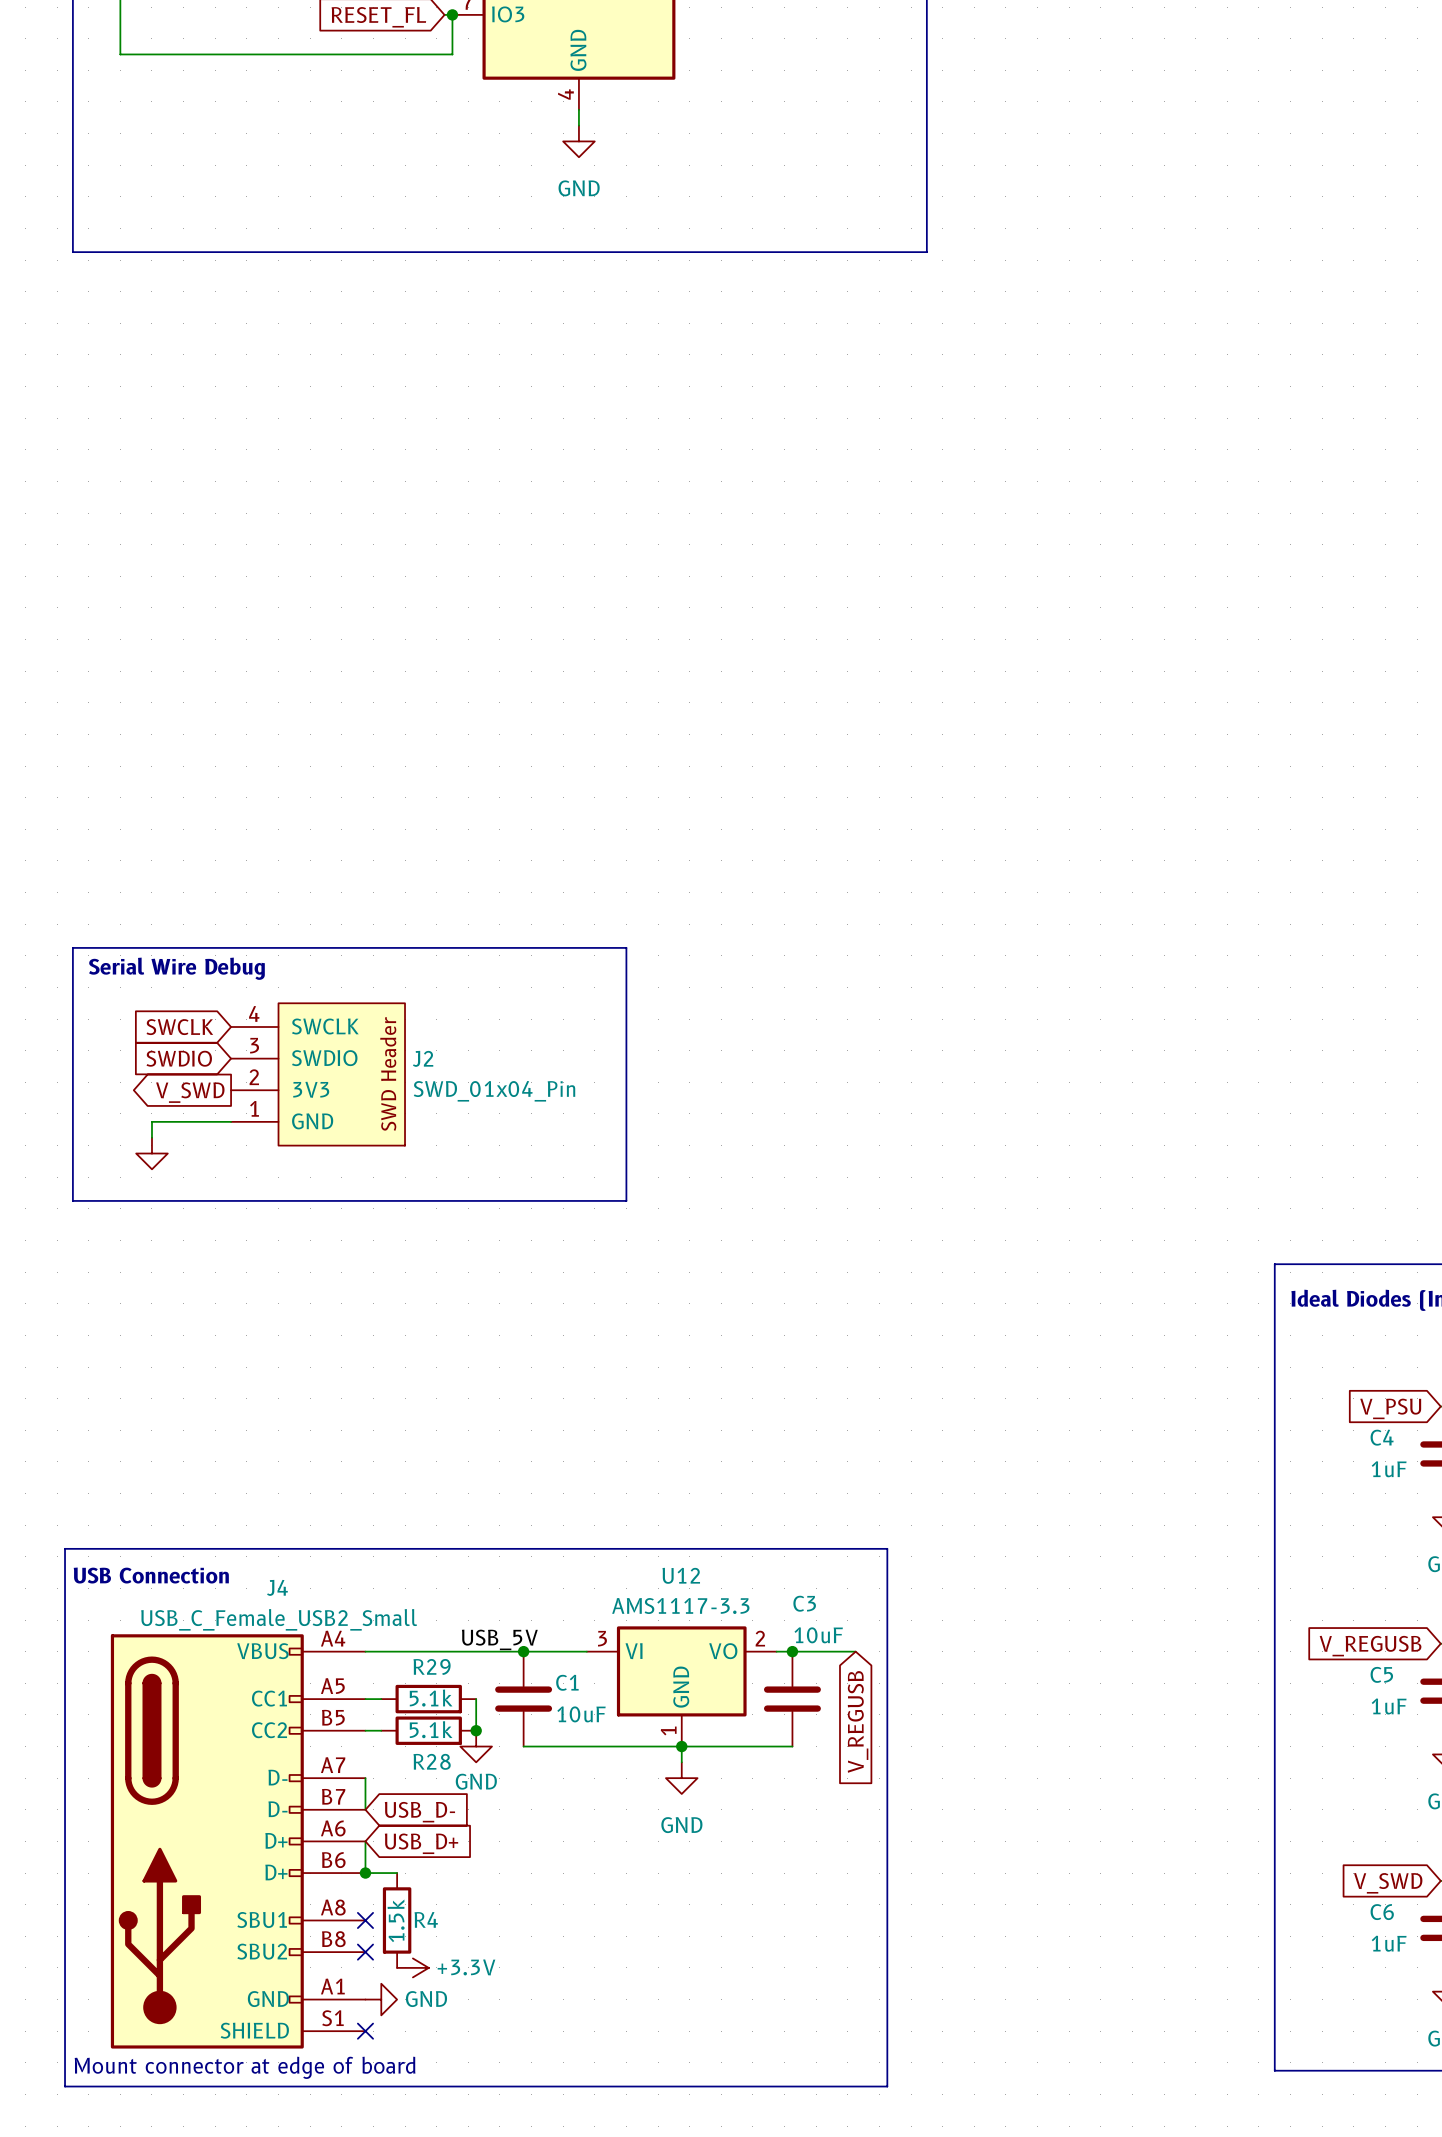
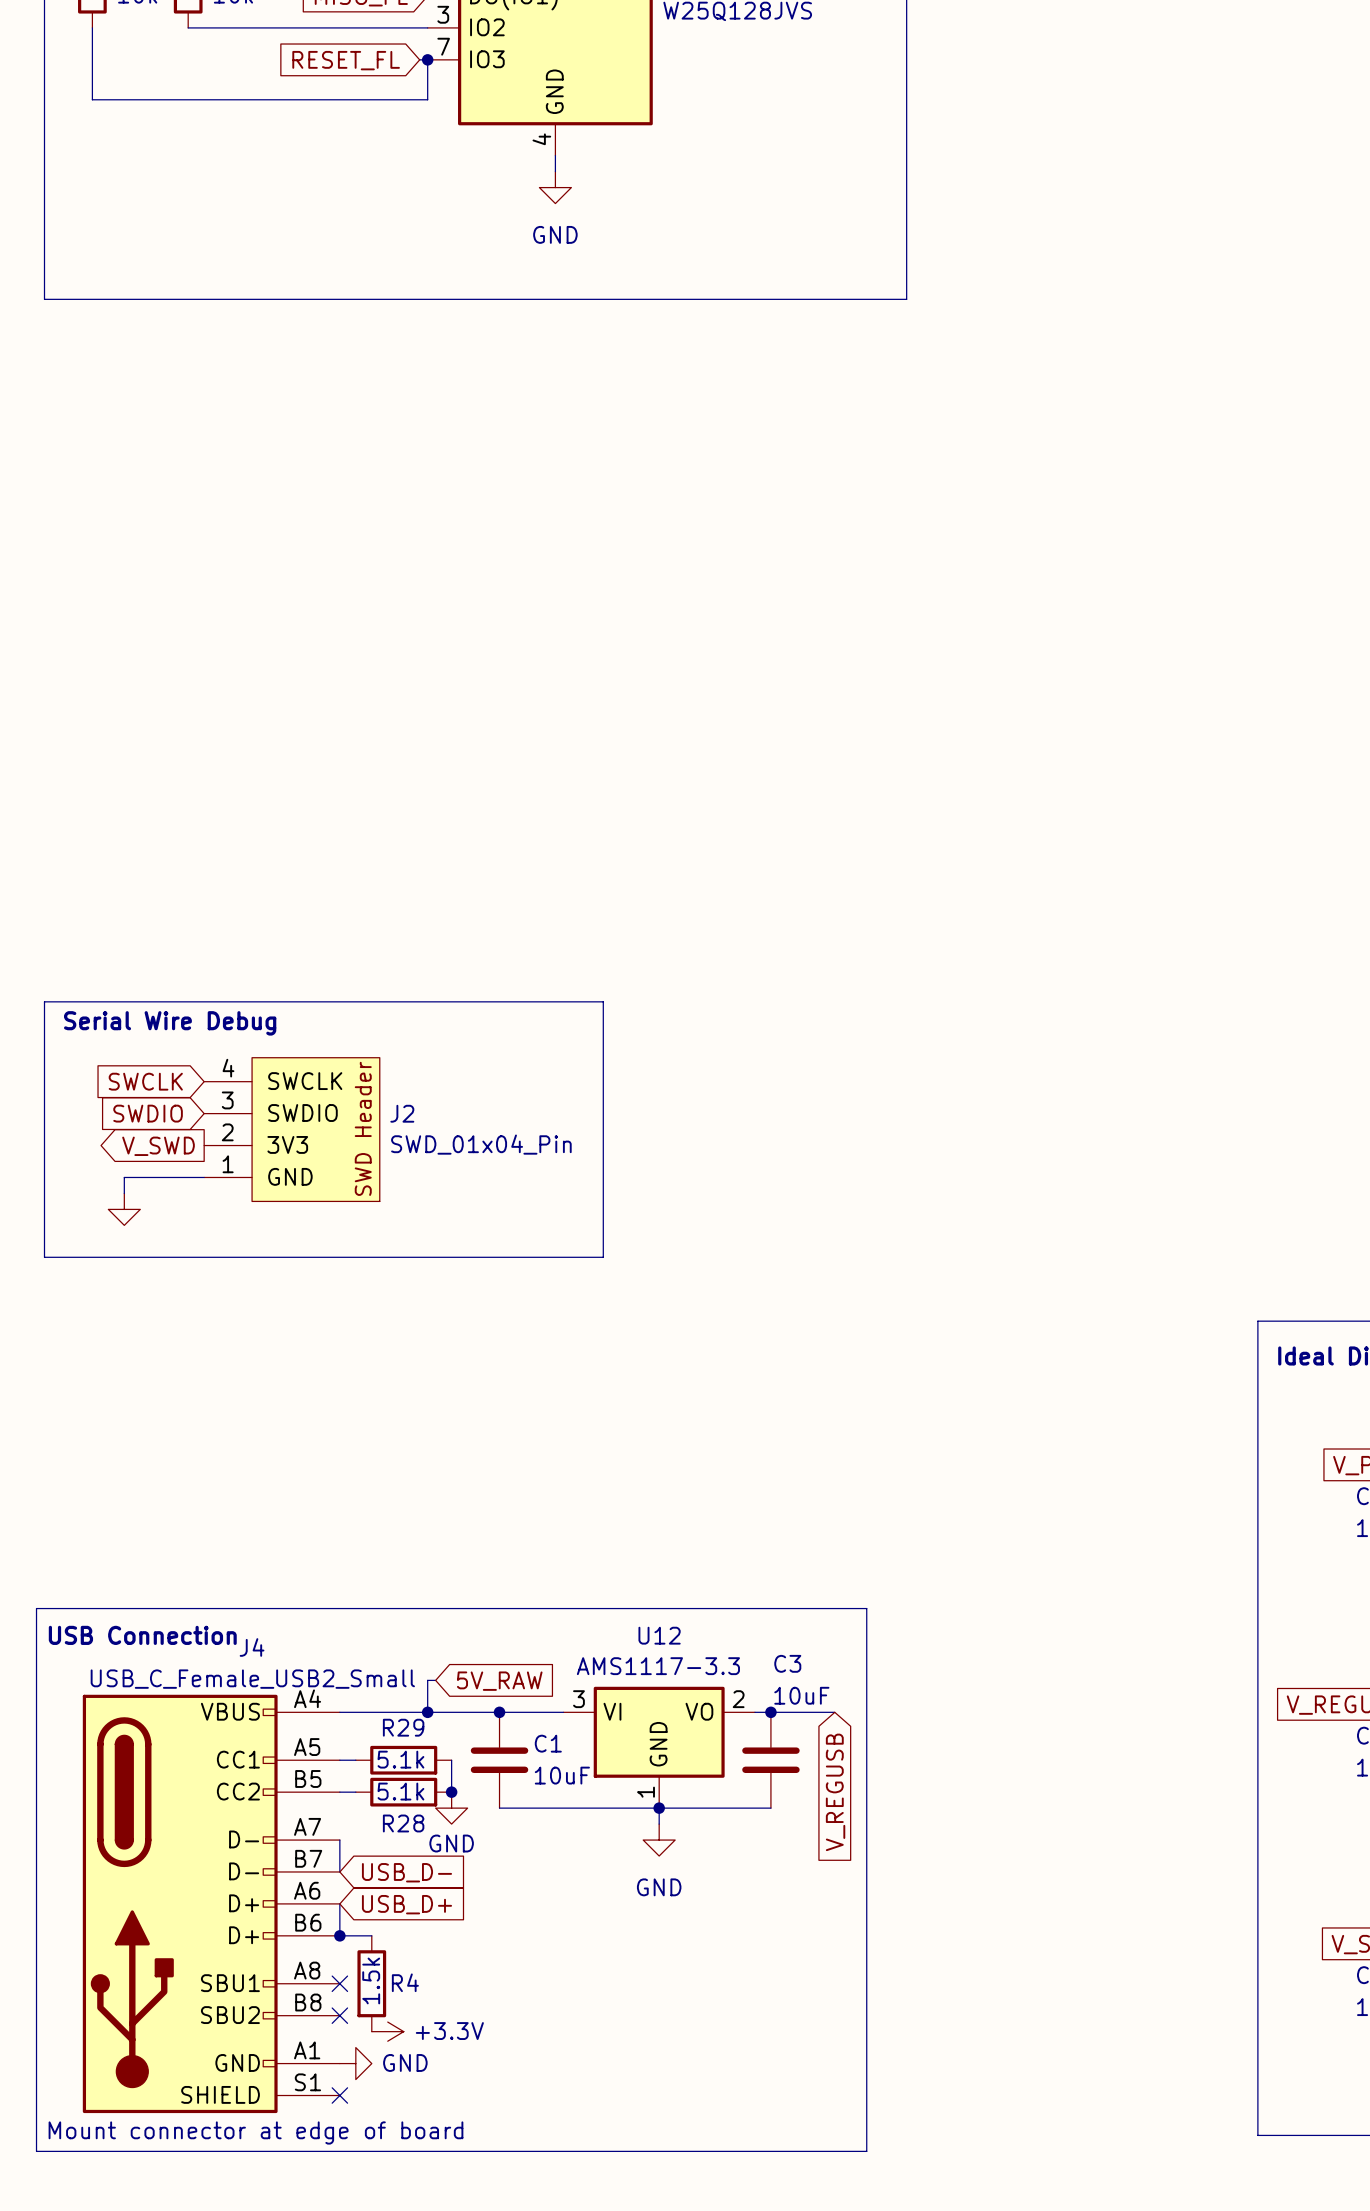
wire: none -> (435, 1680) (427, 1680) (427, 1712)
global label: none -> 5V_RAW (499, 1681)
label: USB_5V (499, 1639) -> none
junction: none -> (427, 1712)

